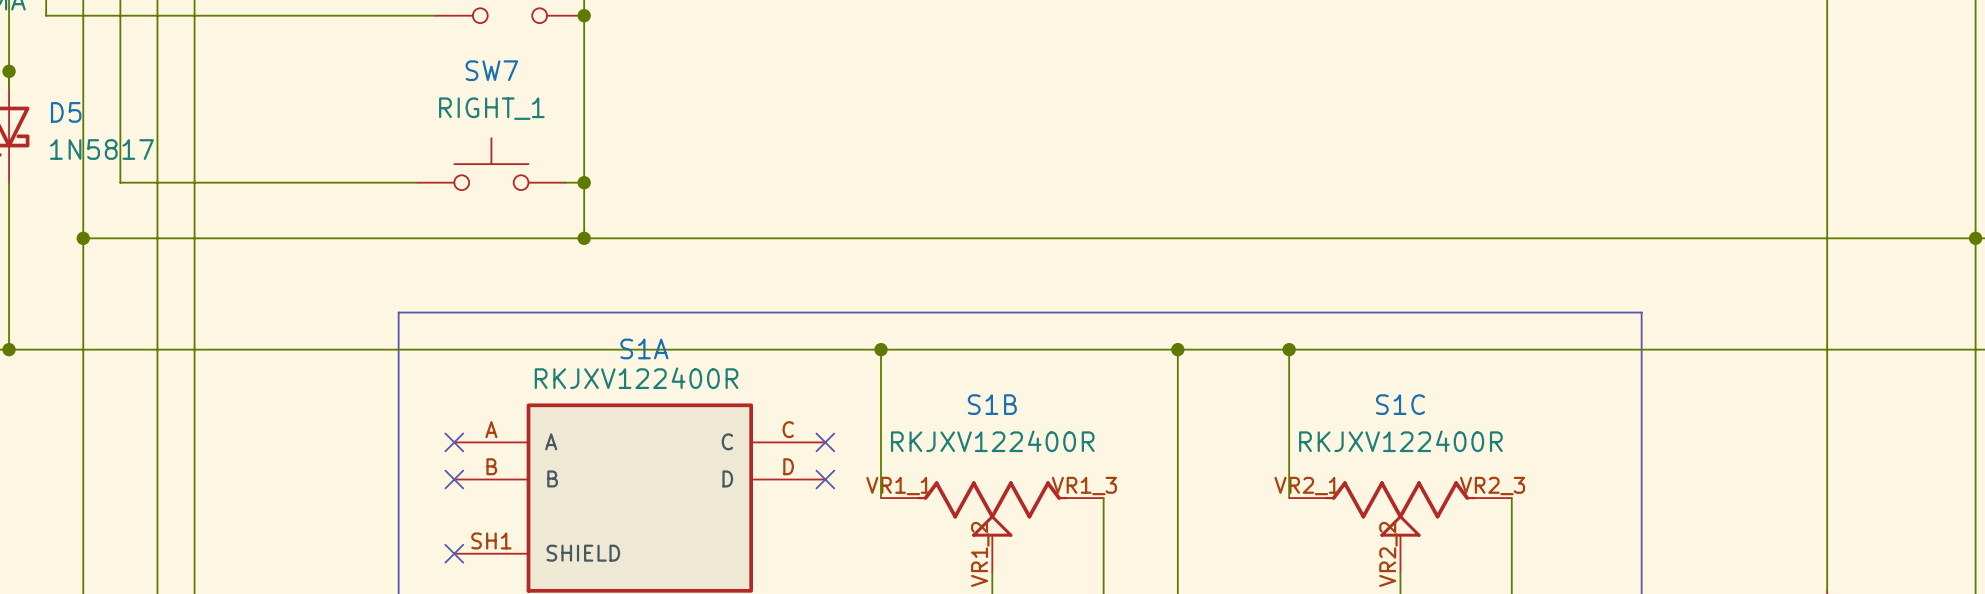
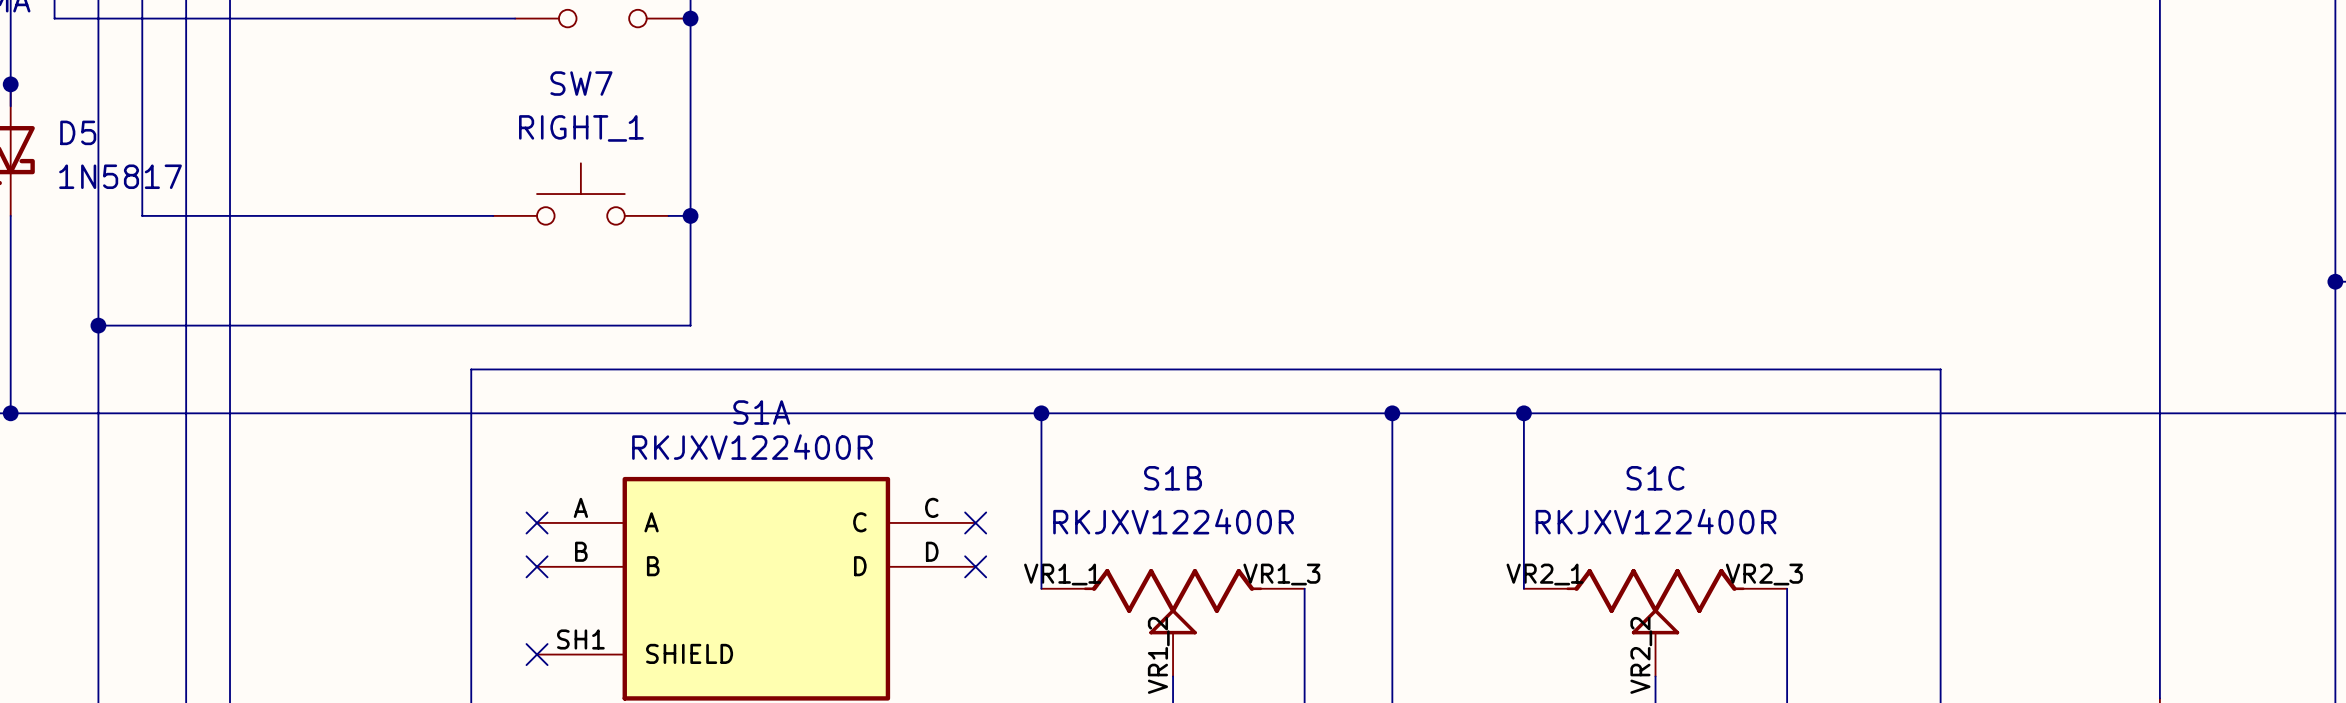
wire: (83, 238) (1975, 238) -> none
junction position: (83, 238) -> (98, 325)
wire: none -> (690, 281) (690, 325) (98, 325)
junction: (584, 238) -> none

